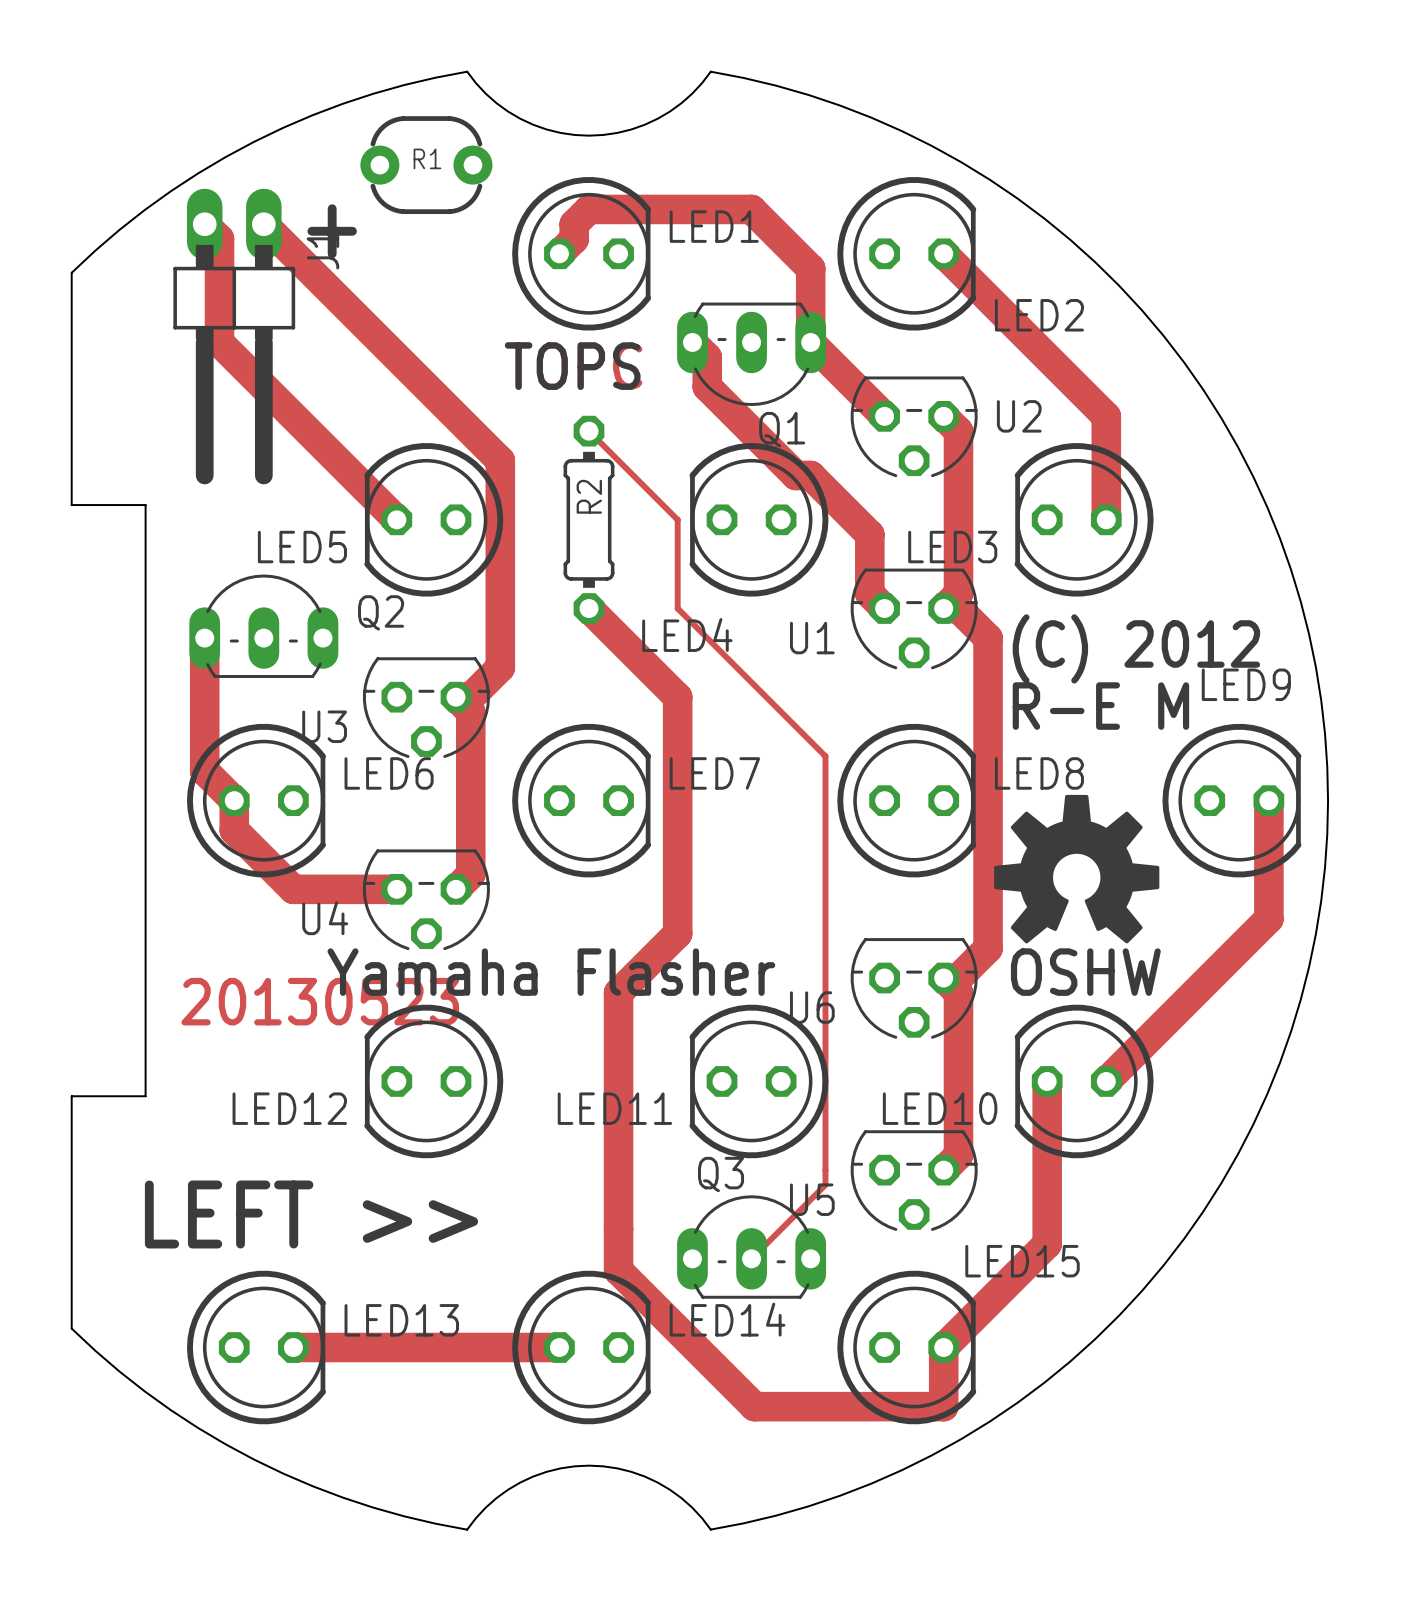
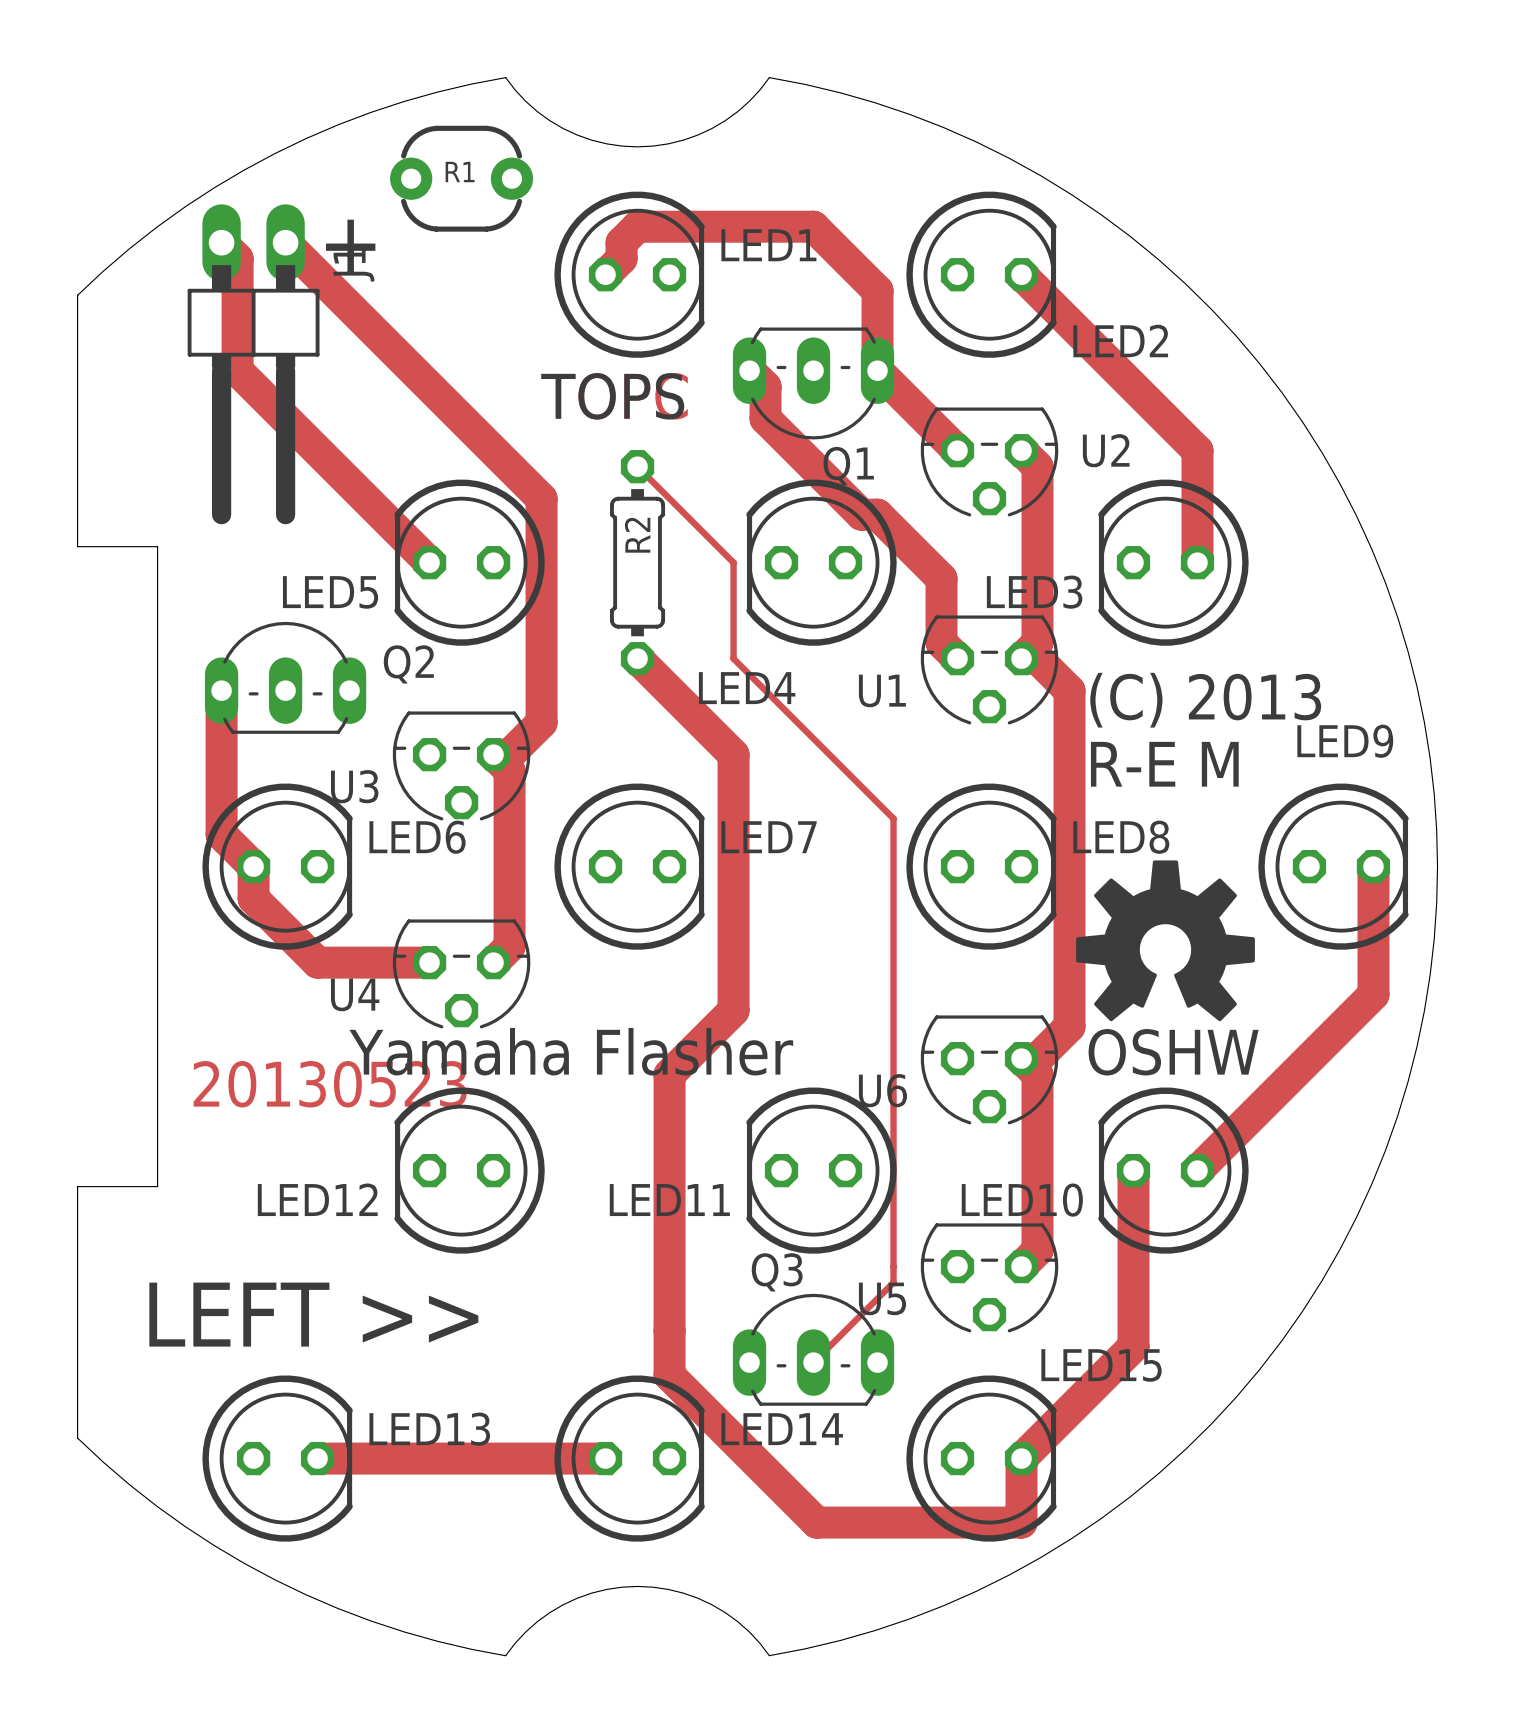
text: (C) 2012 (1136, 648) -> (C) 2013 (1205, 700)

